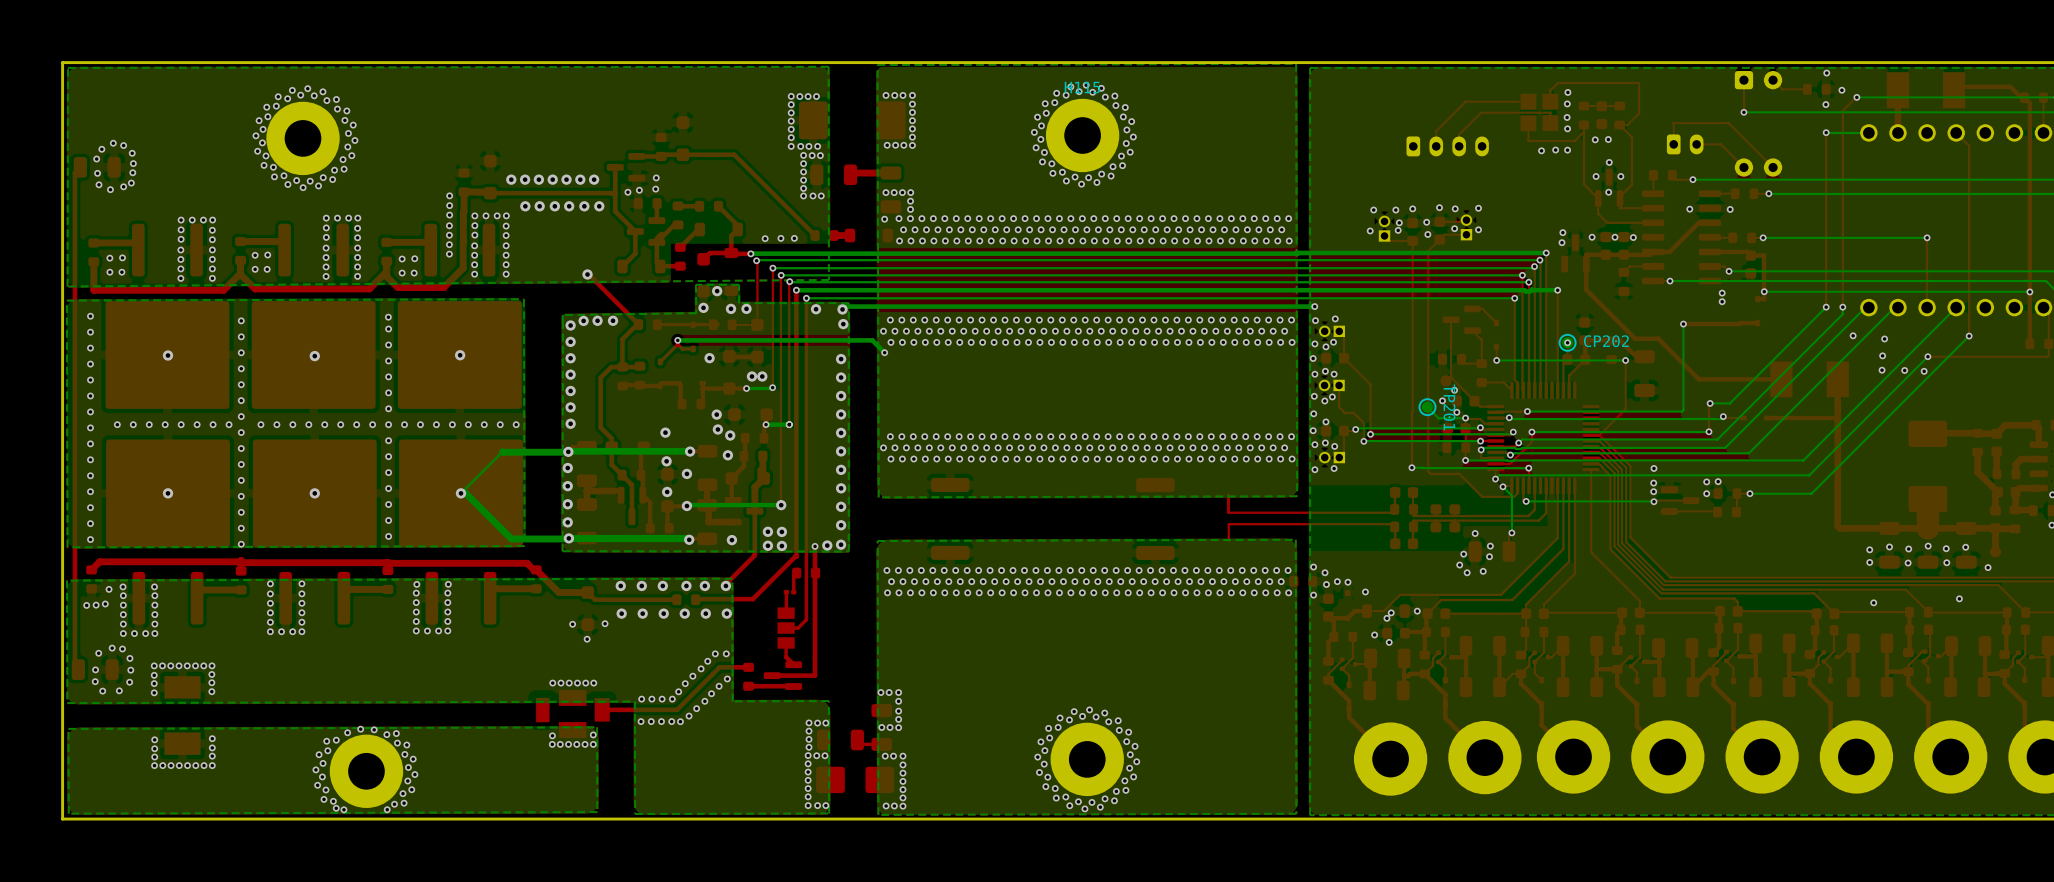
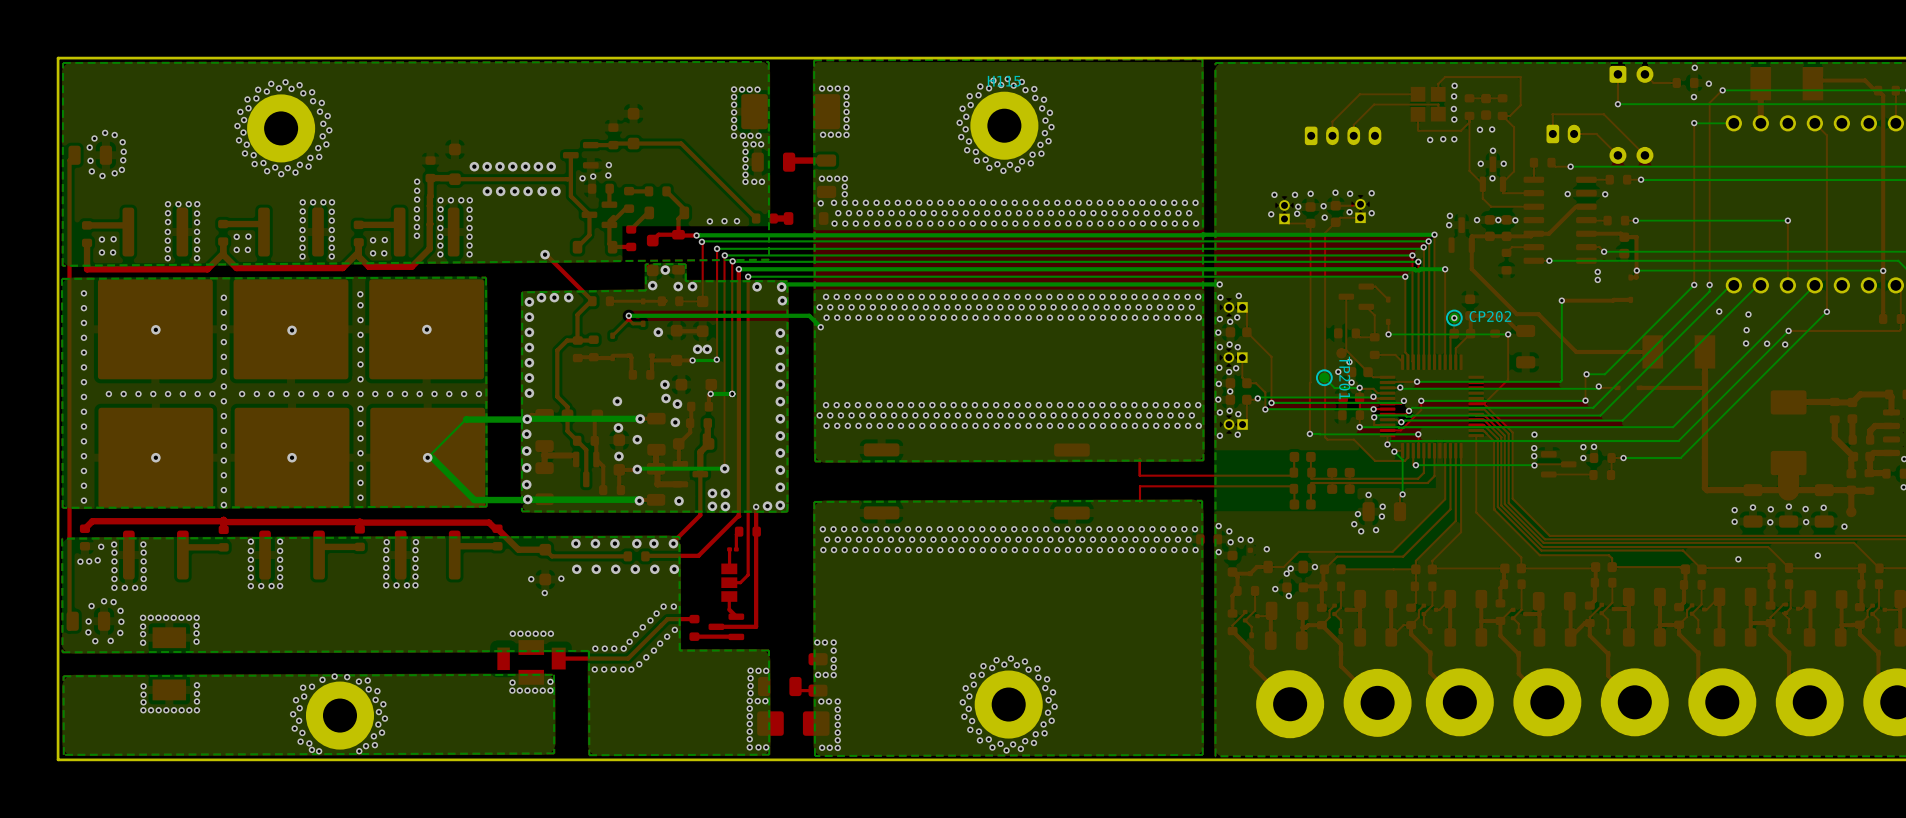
part: none -> (1238, 383)

